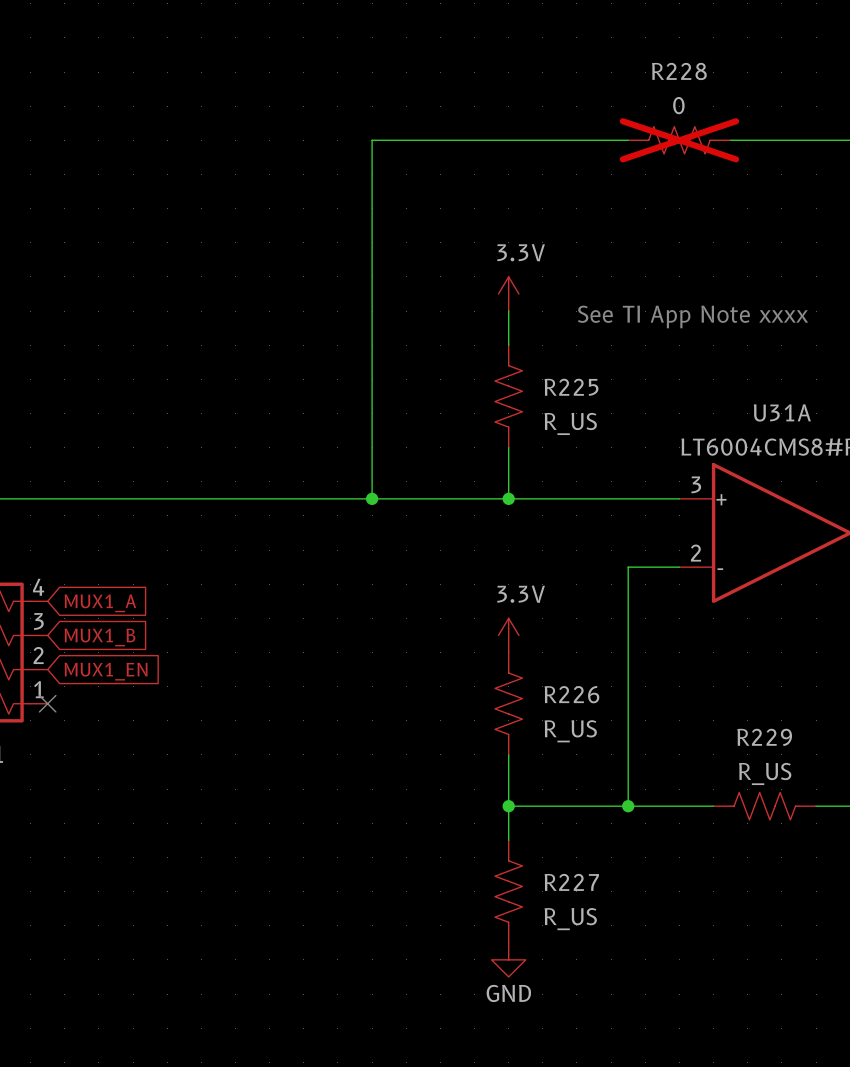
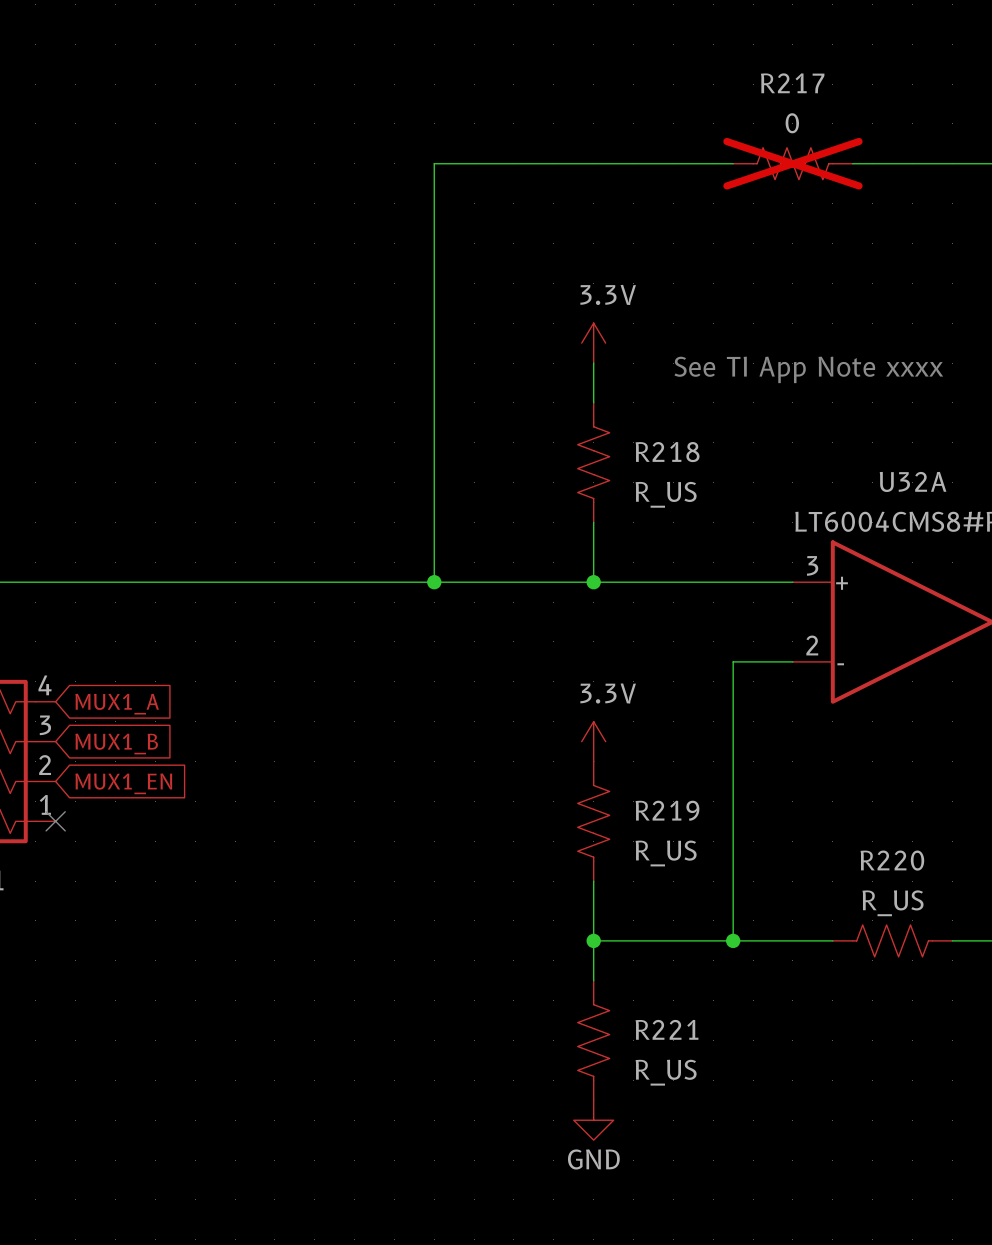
R228 name: R228 (679, 71) -> R217 (792, 83)
R225 name: R225 (571, 387) -> R218 (667, 452)
U31A name: U31A (782, 412) -> U32A (913, 481)
R226 name: R226 (571, 694) -> R219 (667, 810)
R229 name: R229 (764, 737) -> R220 (892, 860)
R227 name: R227 (571, 882) -> R221 (667, 1029)

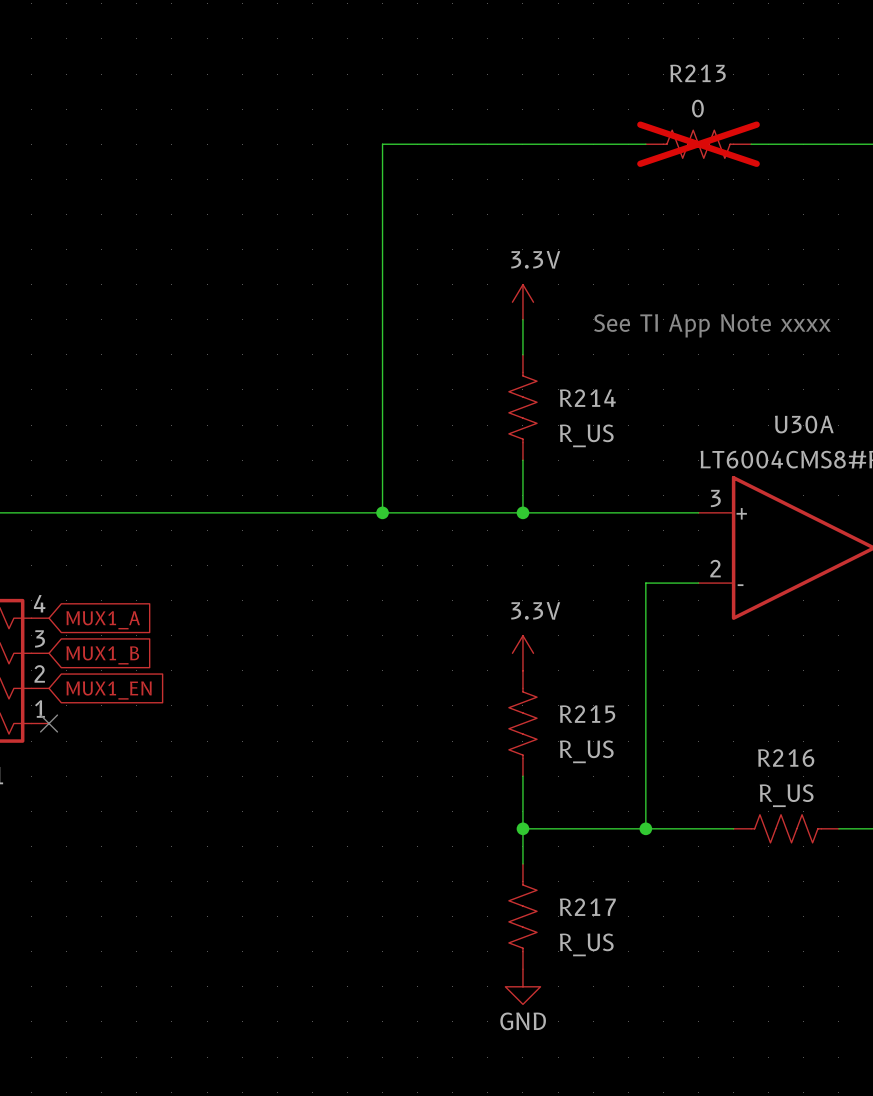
R217 name: R217 (792, 83) -> R213 (698, 73)
R218 name: R218 (667, 452) -> R214 (587, 398)
U32A name: U32A (913, 481) -> U30A (804, 424)
R219 name: R219 (667, 810) -> R215 (587, 714)
R220 name: R220 (892, 860) -> R216 (786, 758)
R221 name: R221 (667, 1029) -> R217 (587, 907)

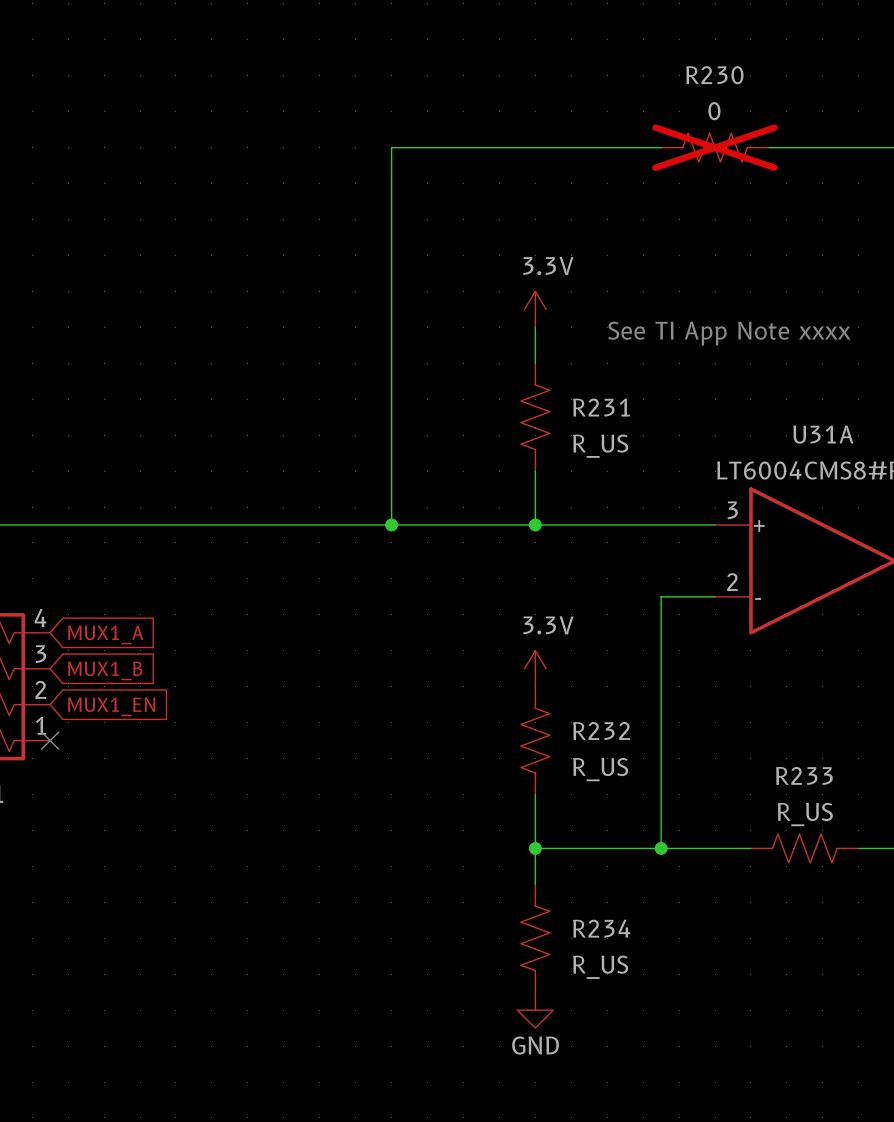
R213 name: R213 (698, 73) -> R230 (714, 75)
R214 name: R214 (587, 398) -> R231 (601, 407)
U30A name: U30A (804, 424) -> U31A (823, 434)
R215 name: R215 (587, 714) -> R232 (601, 730)
R216 name: R216 (786, 758) -> R233 (804, 775)
R217 name: R217 (587, 907) -> R234 (601, 928)

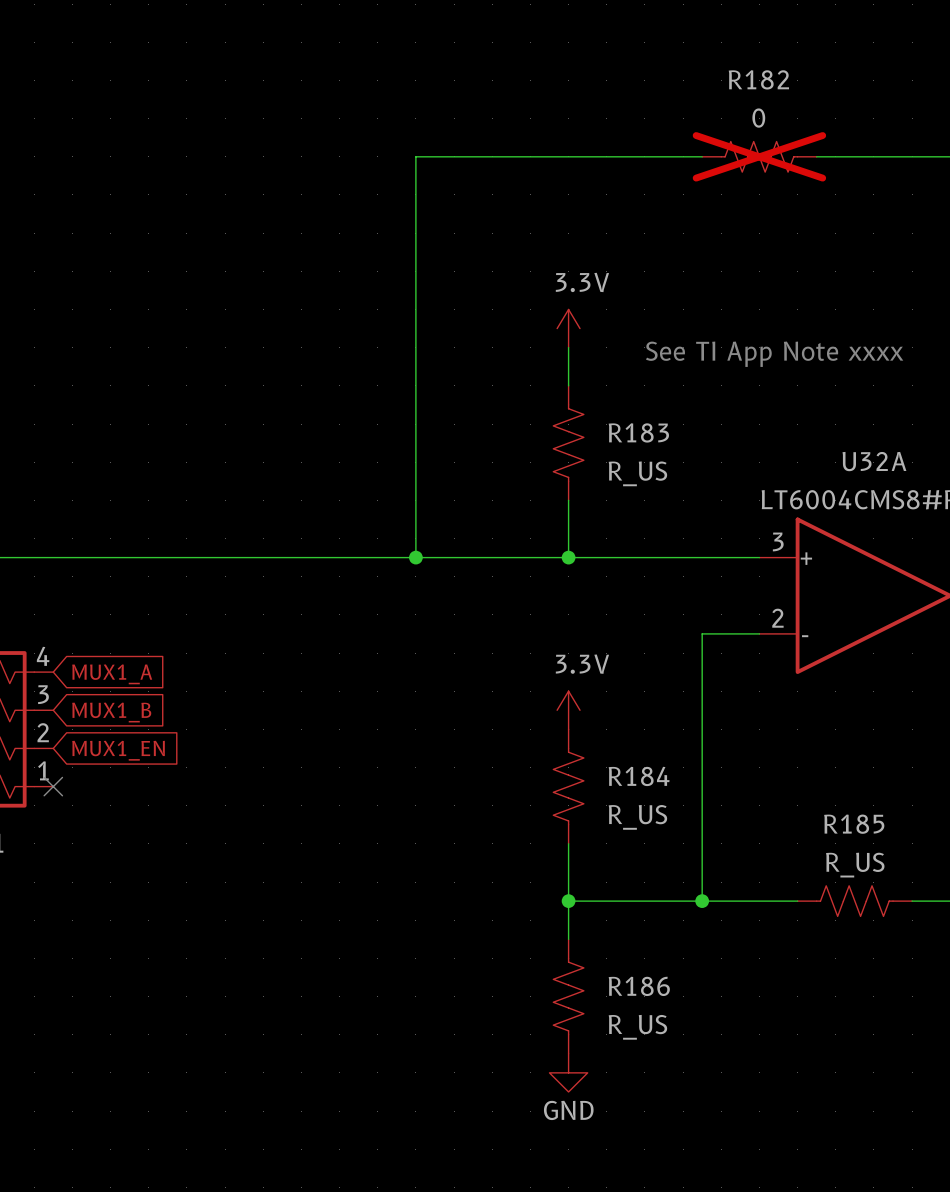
R230 name: R230 (714, 75) -> R182 (758, 79)
R231 name: R231 (601, 407) -> R183 (638, 432)
U31A name: U31A (823, 434) -> U32A (874, 461)
R232 name: R232 (601, 730) -> R184 (639, 776)
R233 name: R233 (804, 775) -> R185 (854, 824)
R234 name: R234 (601, 928) -> R186 (639, 986)

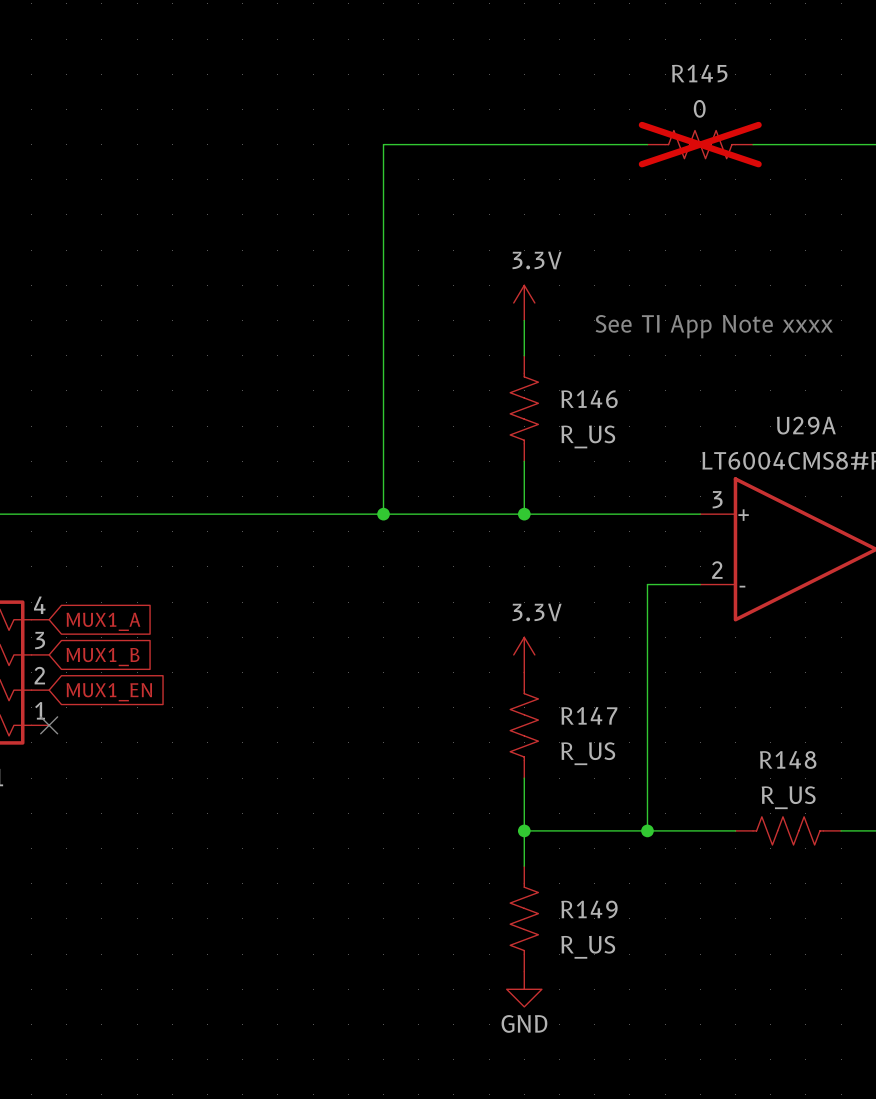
R182 name: R182 (758, 79) -> R145 (699, 73)
R183 name: R183 (638, 432) -> R146 (589, 399)
U32A name: U32A (874, 461) -> U29A (806, 425)
R184 name: R184 (639, 776) -> R147 (589, 715)
R185 name: R185 (854, 824) -> R148 (788, 759)
R186 name: R186 (639, 986) -> R149 (589, 909)

